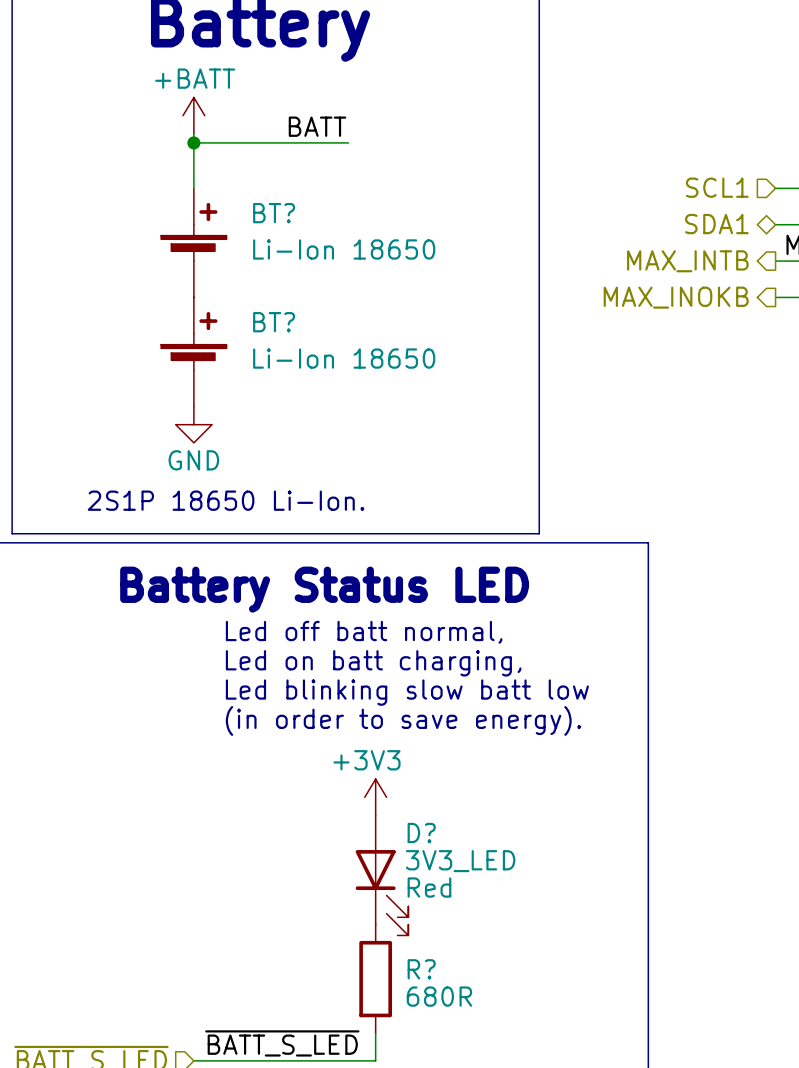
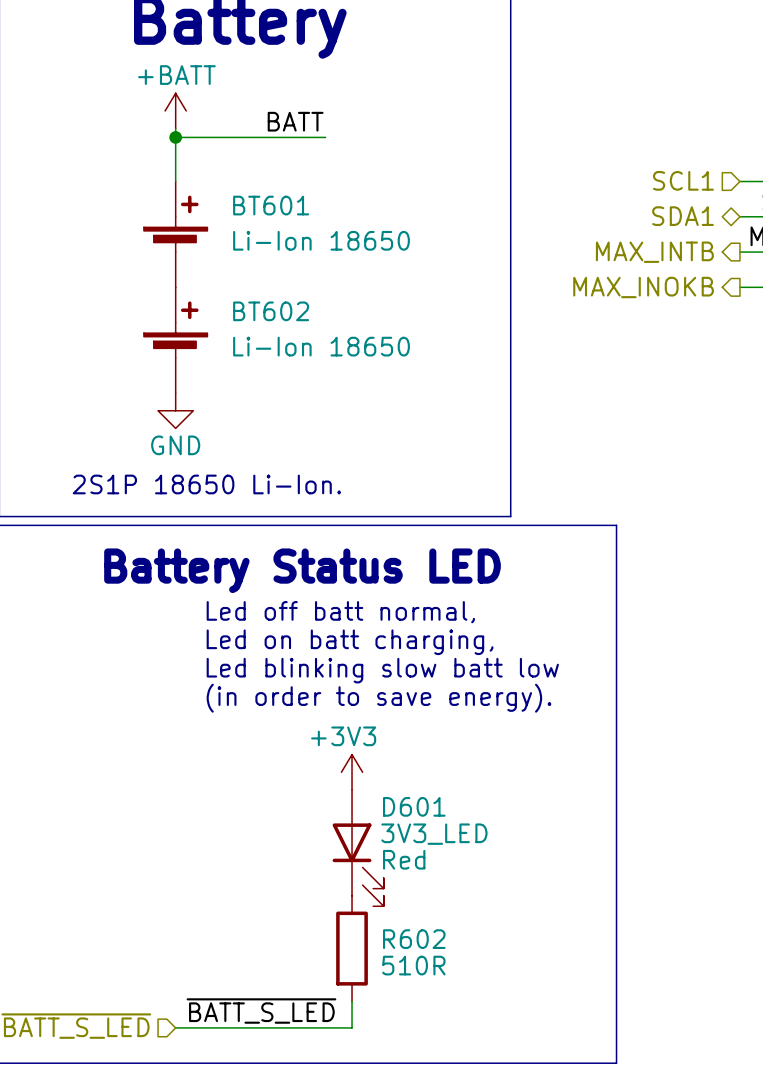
BT? name: BT? (274, 213) -> BT601 (271, 205)
BT? name: BT? (274, 322) -> BT602 (271, 311)
D? name: D? (421, 832) -> D601 (414, 806)
R? name: R? (421, 969) -> R602 (414, 939)
R? value: 680R (439, 996) -> 510R (413, 965)

